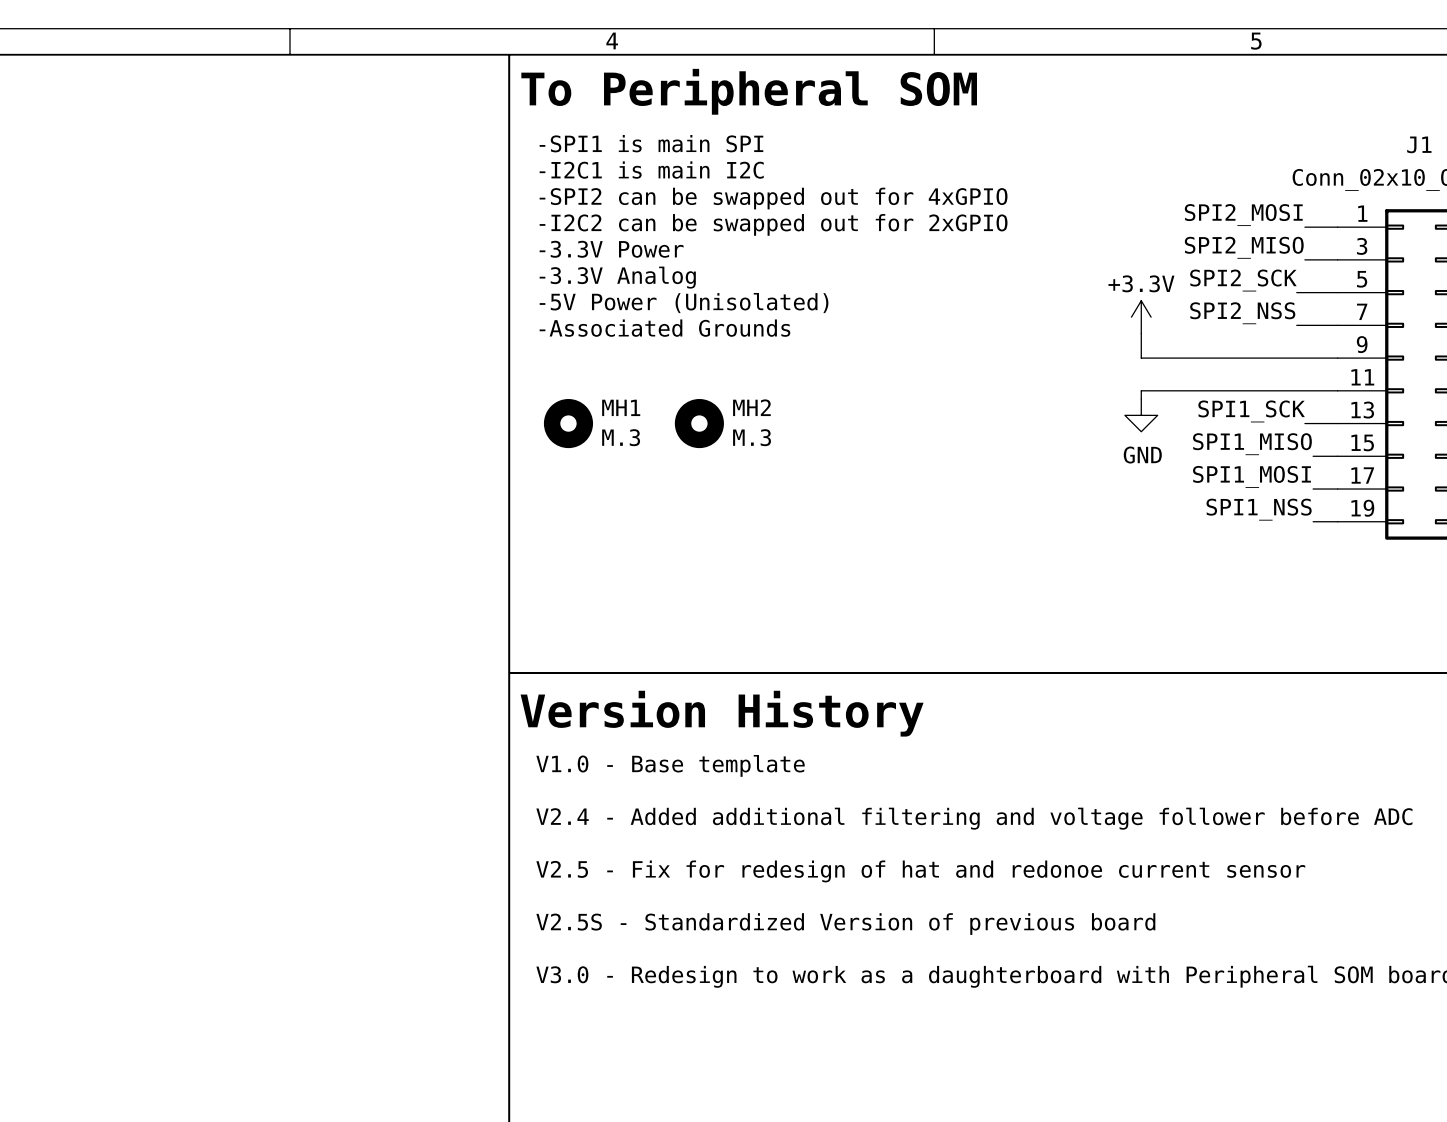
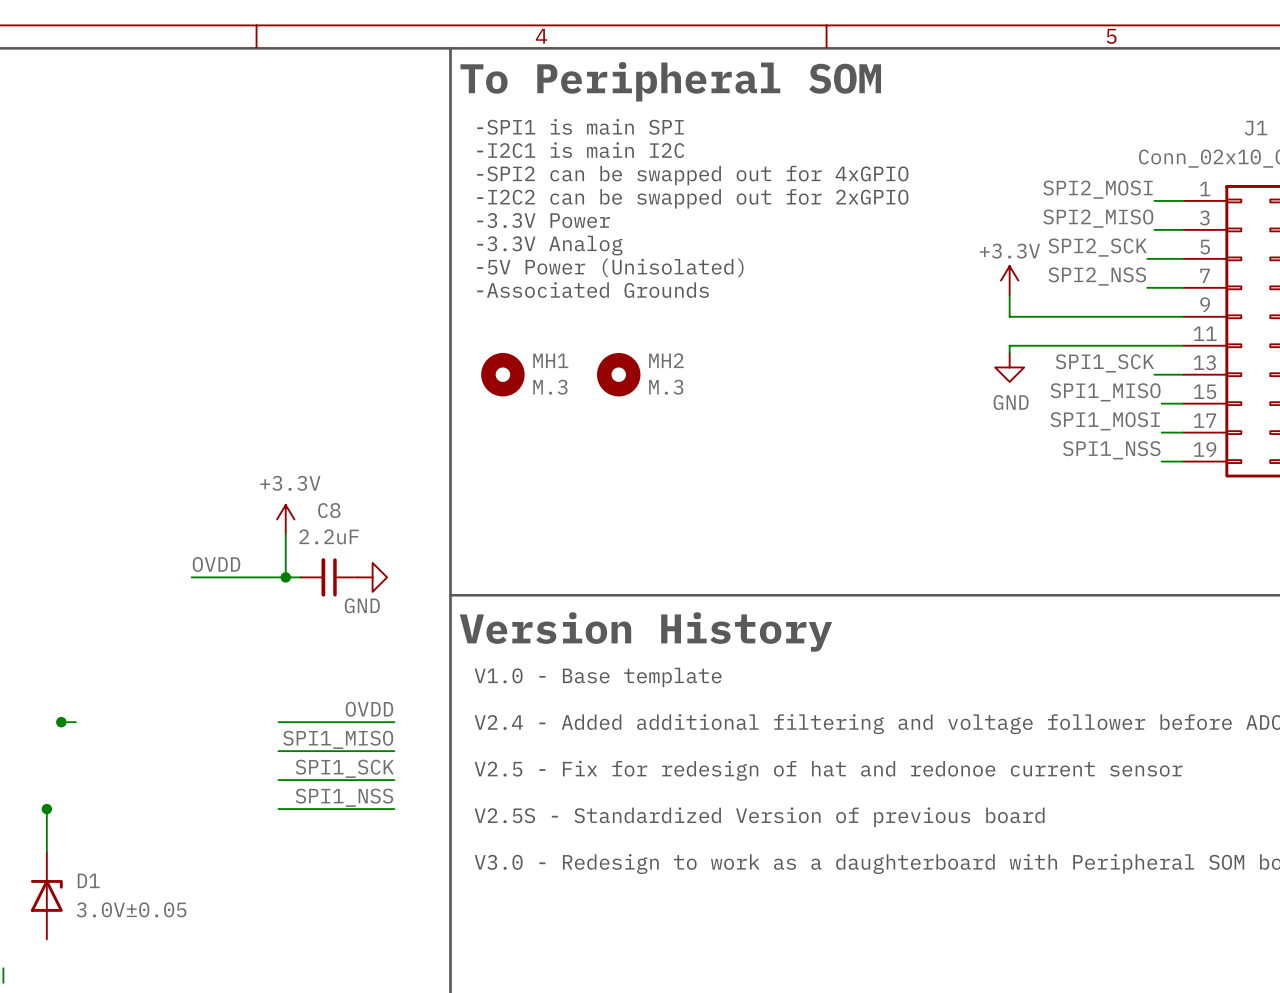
power symbol: none -> +3.3V (285, 519)
wire: none -> (285, 533) (285, 577)
label: none -> OVDD (216, 564)
wire: none -> (191, 577) (300, 577)
junction: none -> (285, 577)
C8: none -> 2.2uF (329, 577)
power symbol: none -> GND (372, 577)
label: none -> OVDD (369, 709)
wire: none -> (61, 722) (75, 722)
junction: none -> (61, 722)
wire: none -> (278, 722) (394, 722)
label: none -> SPI1_MISO (338, 739)
wire: none -> (278, 751) (394, 751)
label: none -> SPI1_SCK (344, 768)
wire: none -> (278, 780) (394, 780)
label: none -> SPI1_NSS (344, 797)
wire: none -> (46, 809) (46, 852)
junction: none -> (46, 809)
wire: none -> (278, 809) (394, 809)
D1: none -> 3.0V±0.05 (46, 895)
wire: none -> (3, 968) (3, 982)

